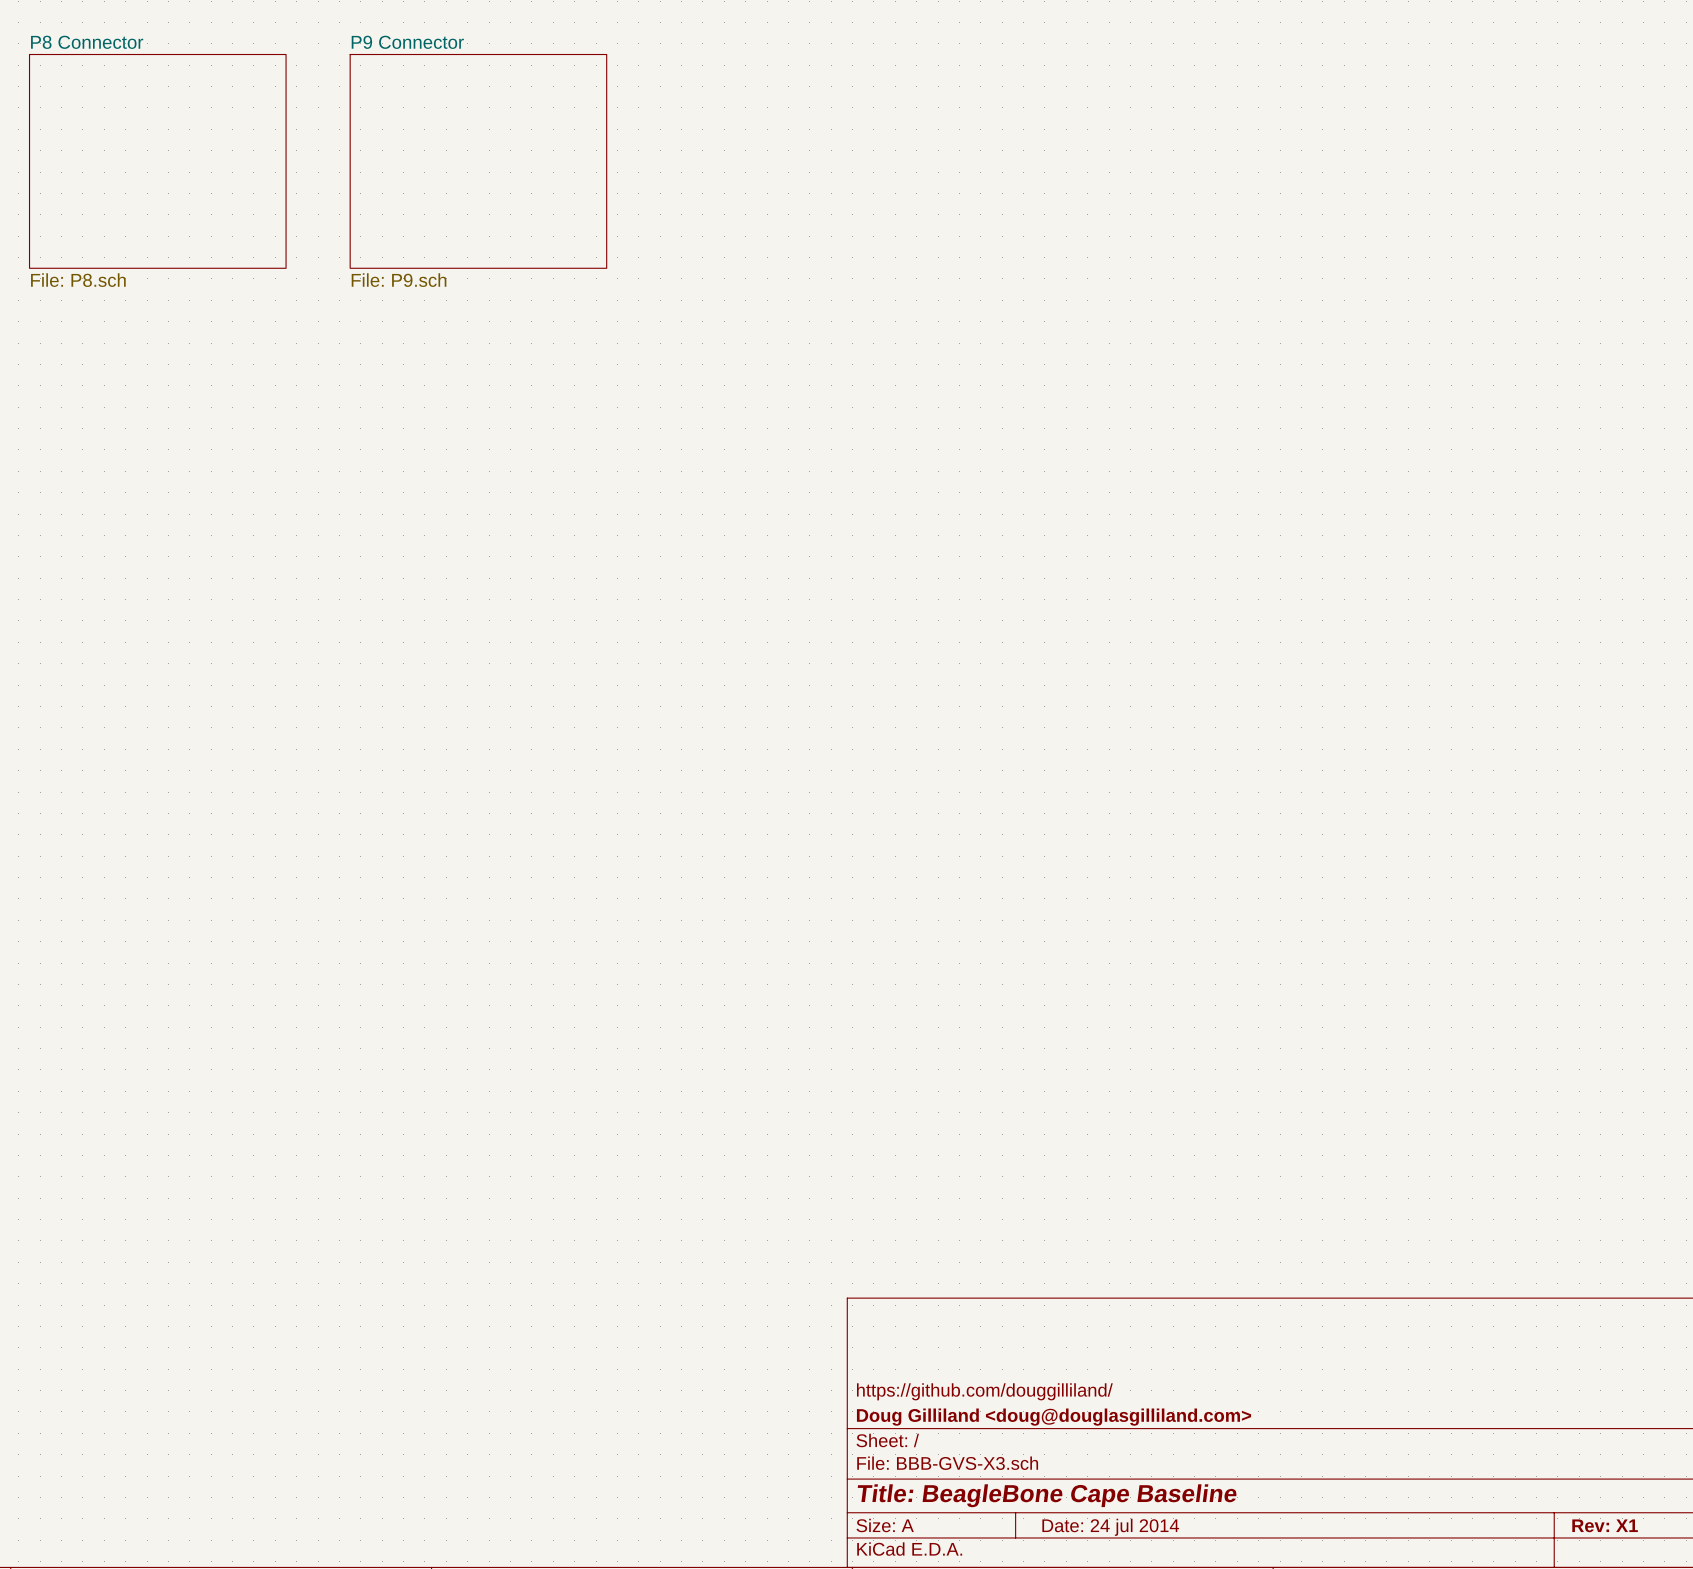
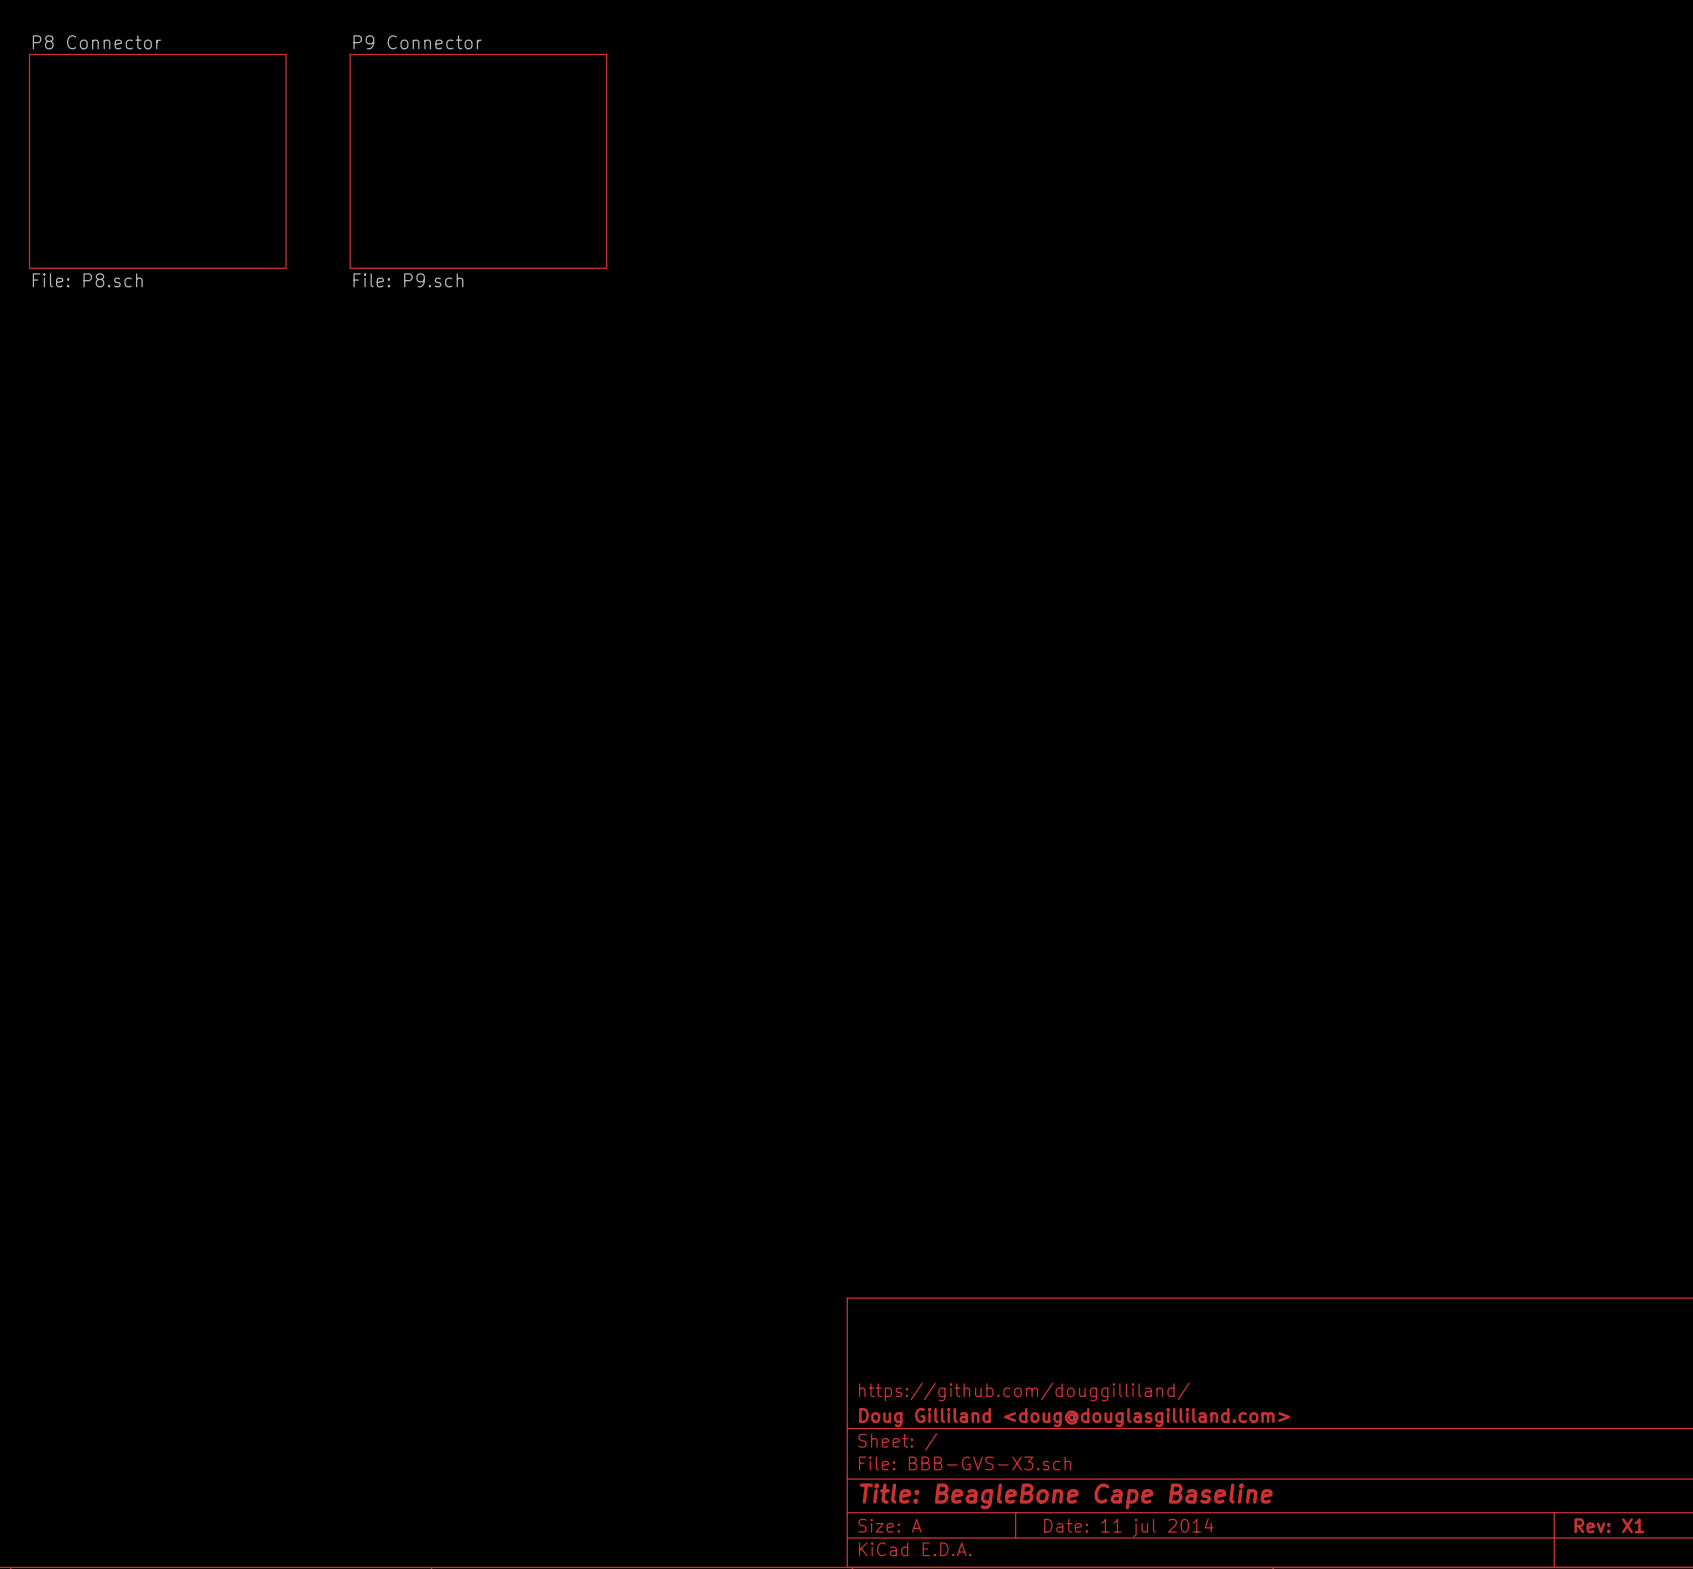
title block: Date: 24 jul 2014 (1110, 1527) -> Date: 11 jul 2014 (1128, 1527)

